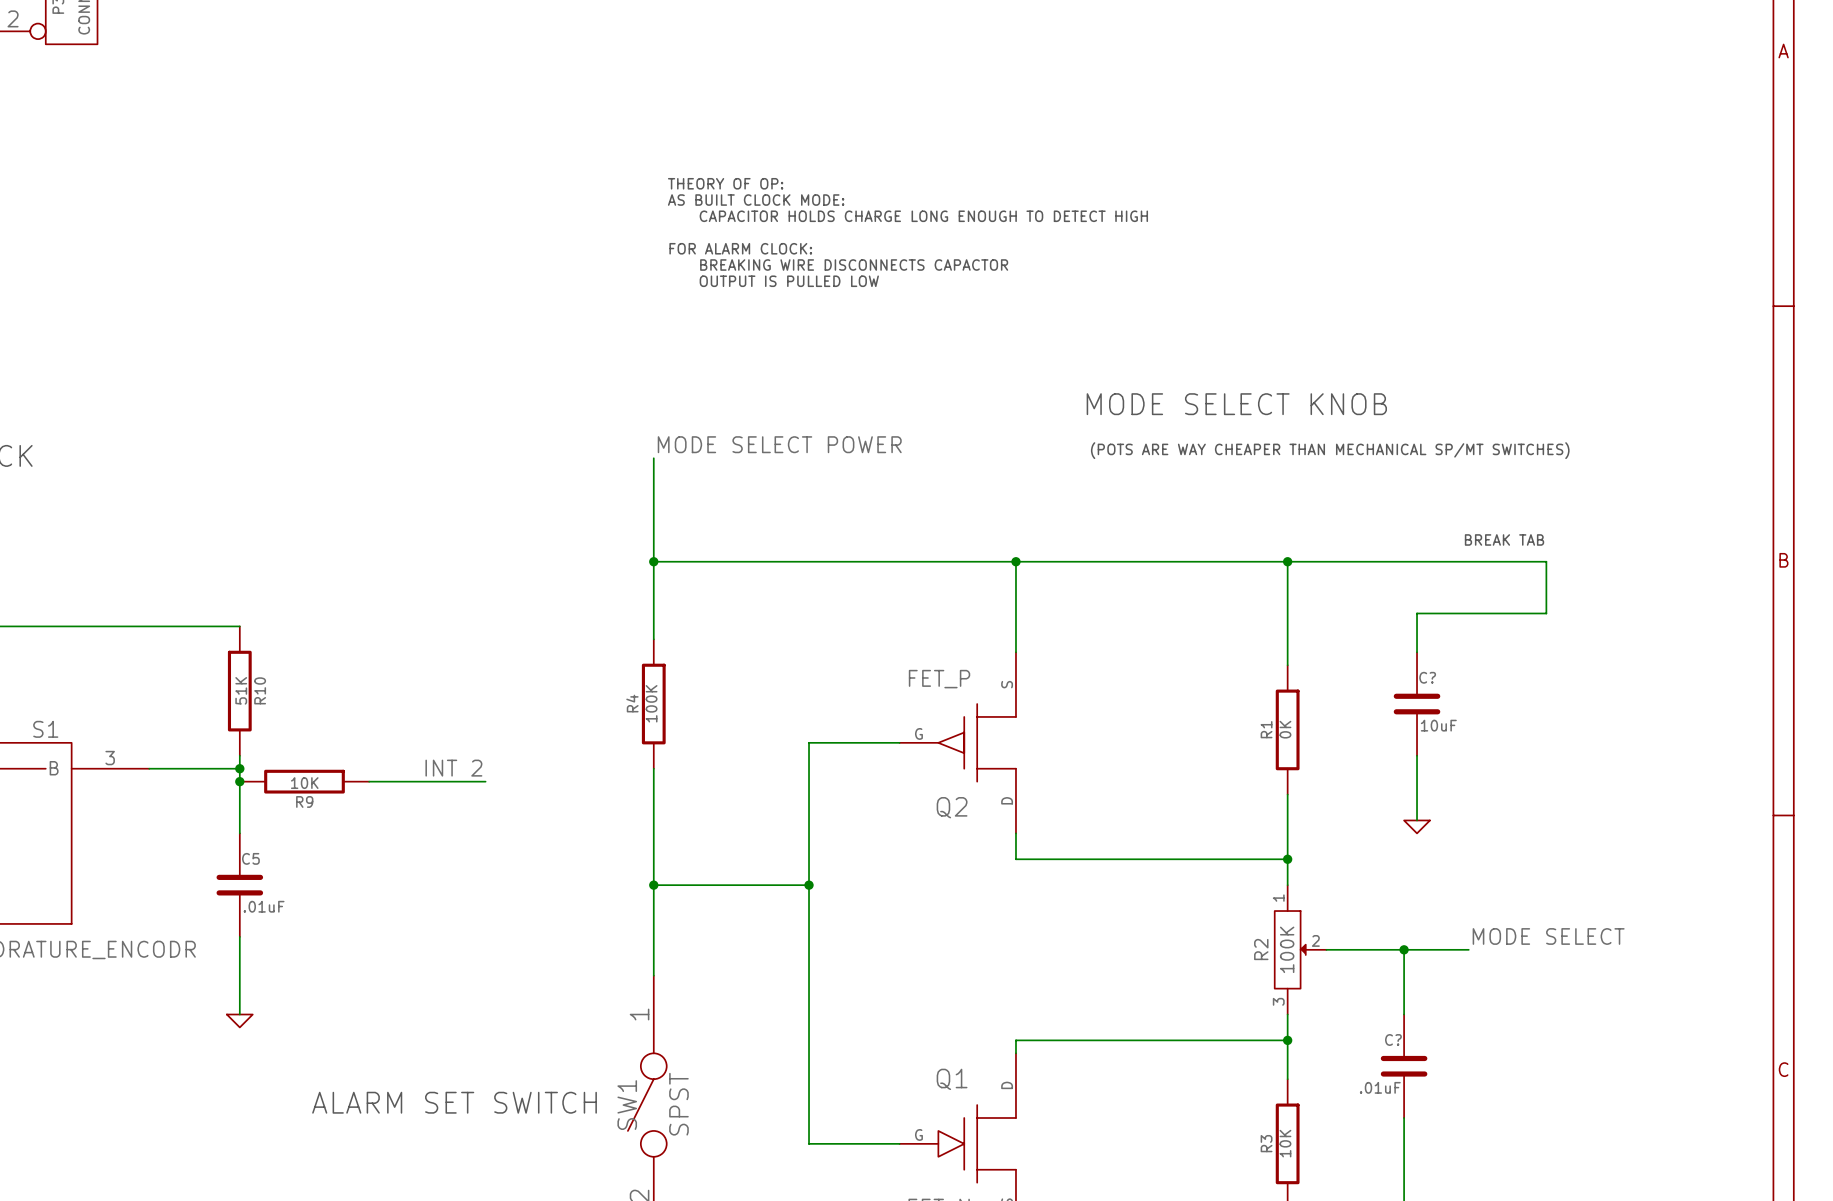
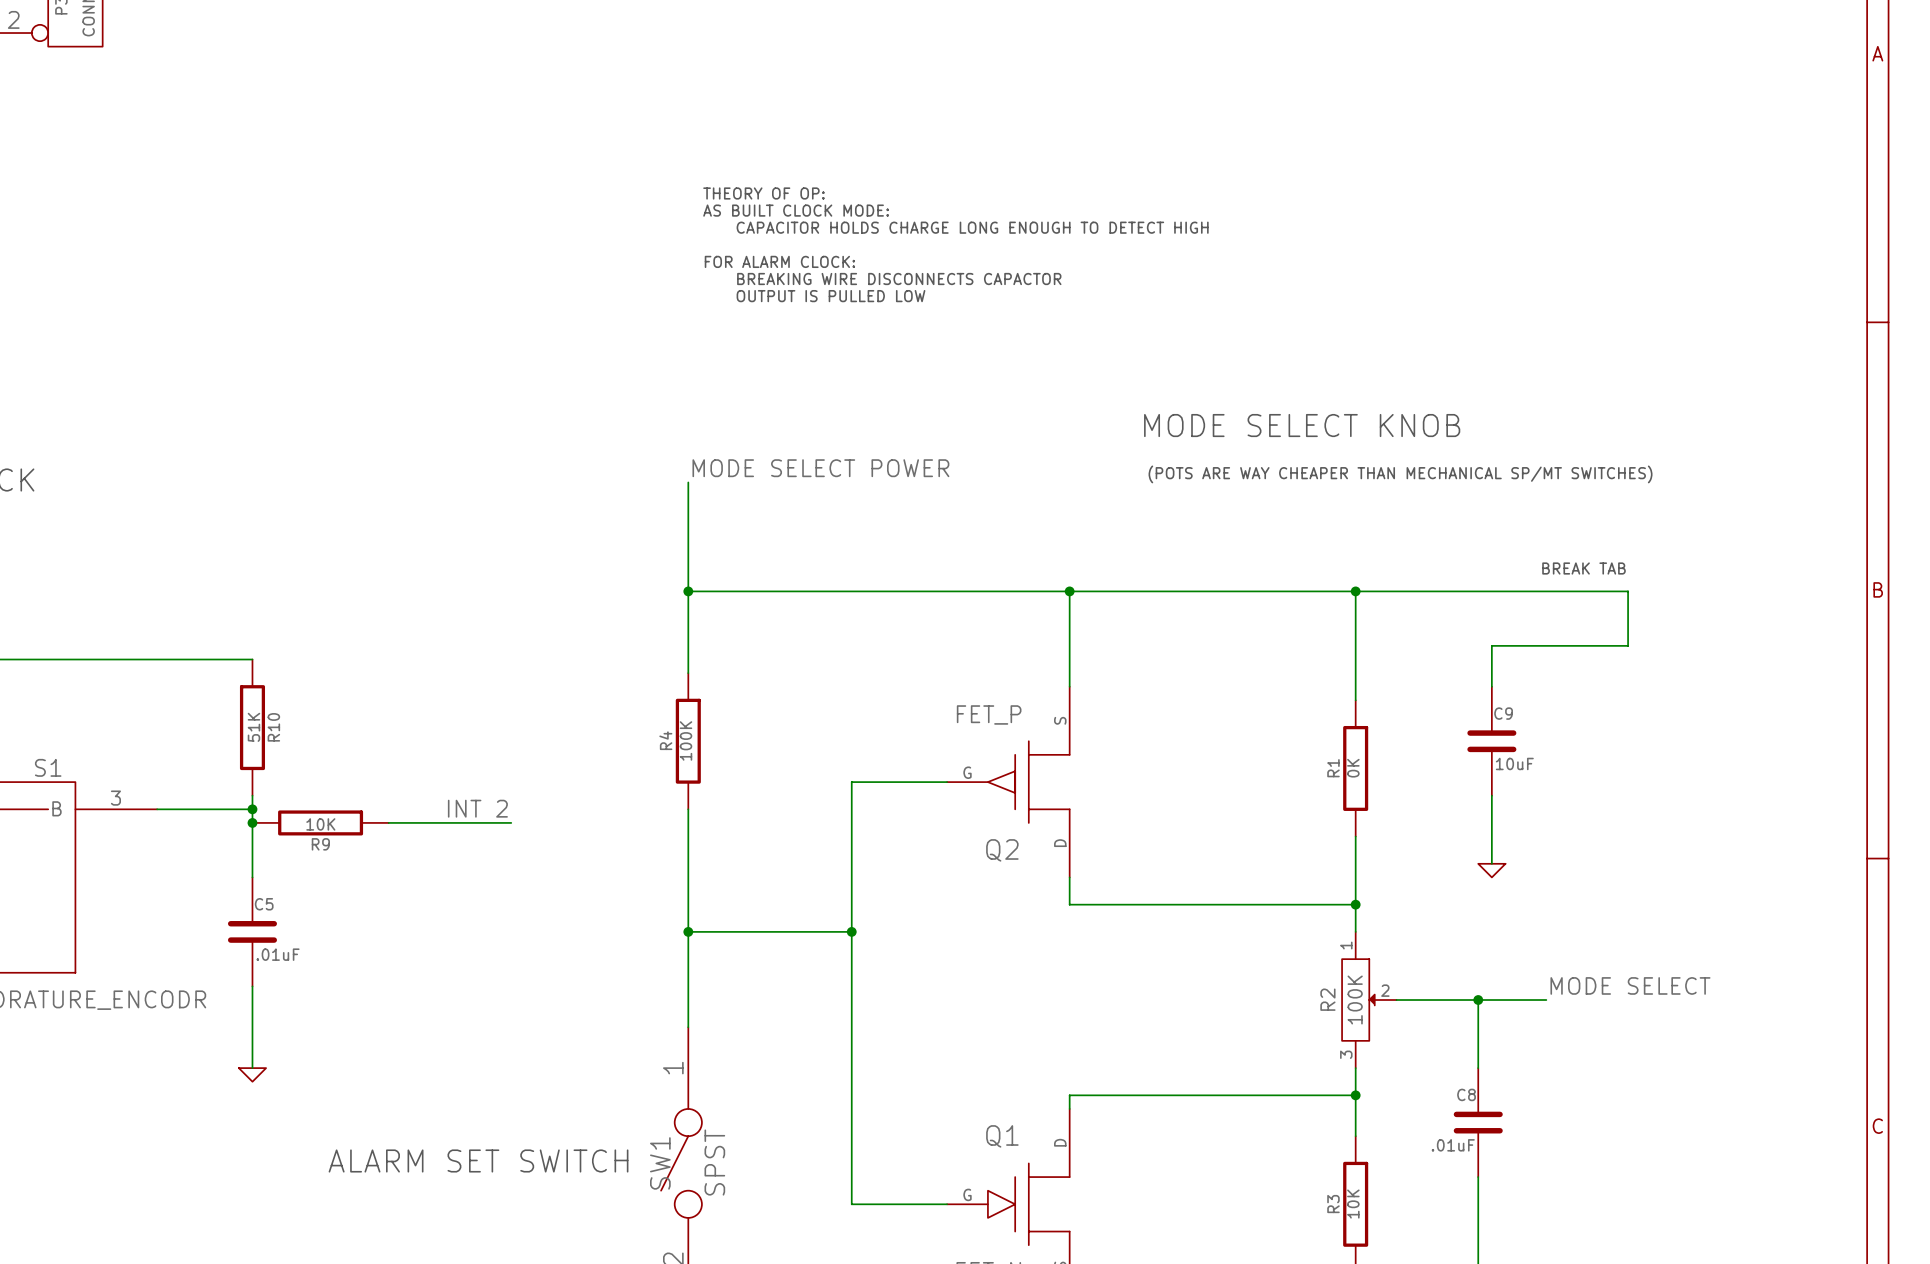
C? name: C? (1427, 677) -> C9 (1503, 713)
C? name: C? (1393, 1039) -> C8 (1466, 1094)

